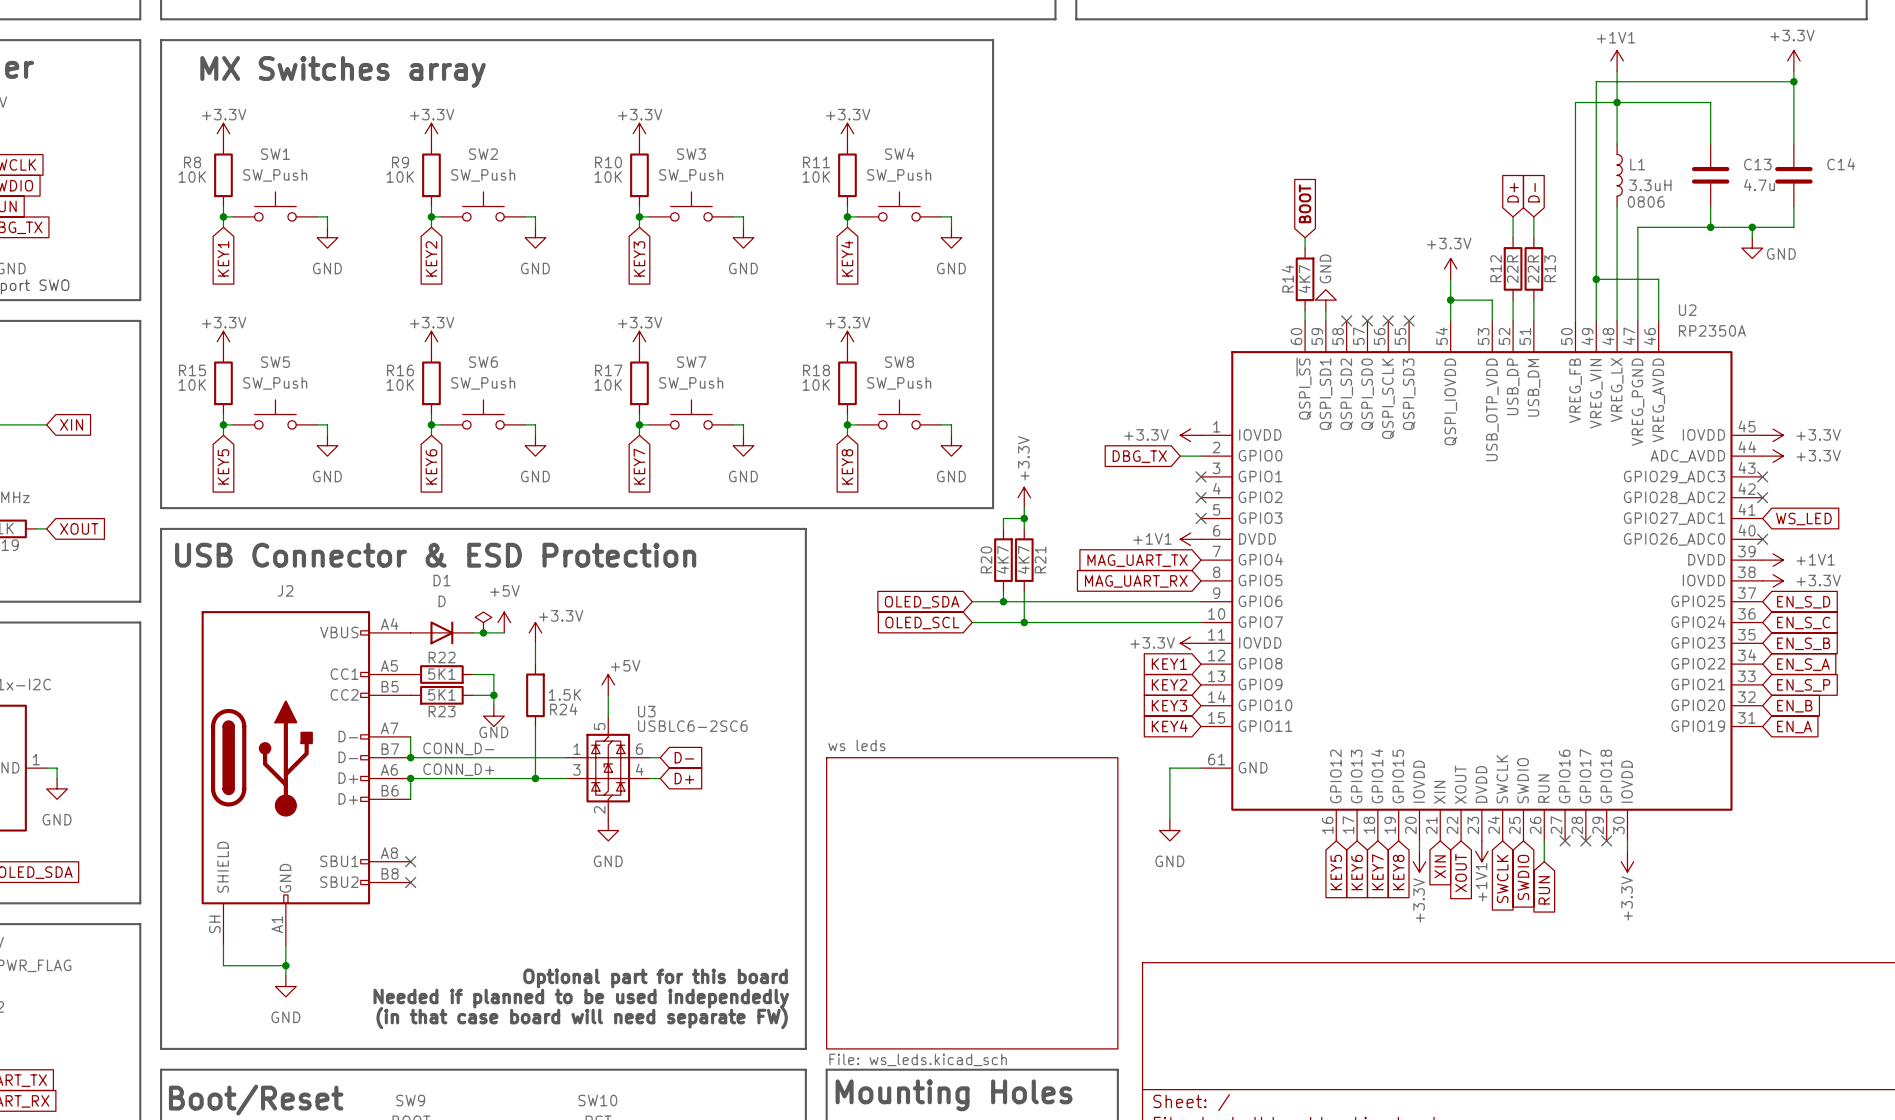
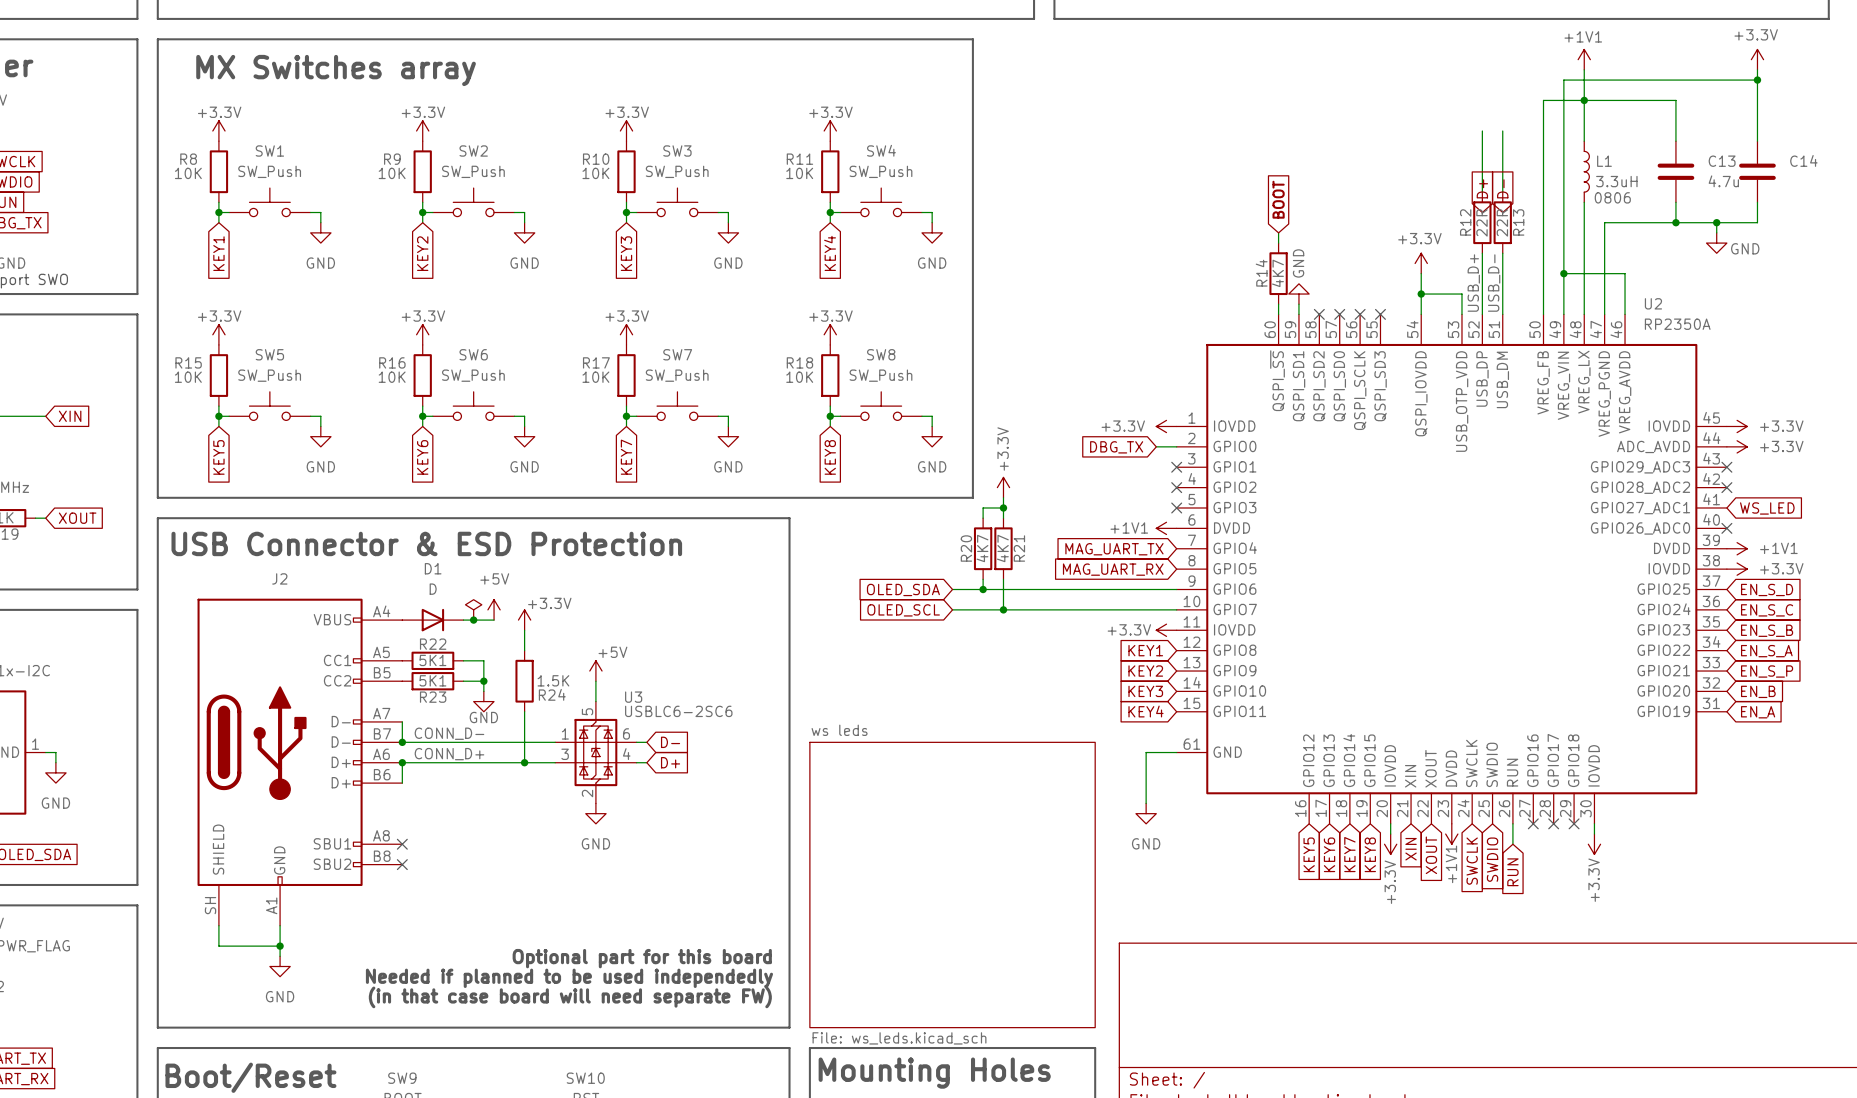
wire: none -> (1482, 131) (1482, 192)
wire: none -> (1502, 131) (1502, 192)
wire: (1513, 216) (1513, 237) -> none
wire: (1533, 216) (1533, 237) -> none
wire: none -> (1482, 253) (1482, 294)
wire: none -> (1502, 253) (1502, 294)
R12 position: (1513, 268) -> (1482, 222)
R13 position: (1533, 268) -> (1502, 222)
label: none -> USB_D+ (1473, 283)
label: none -> USB_D- (1494, 283)

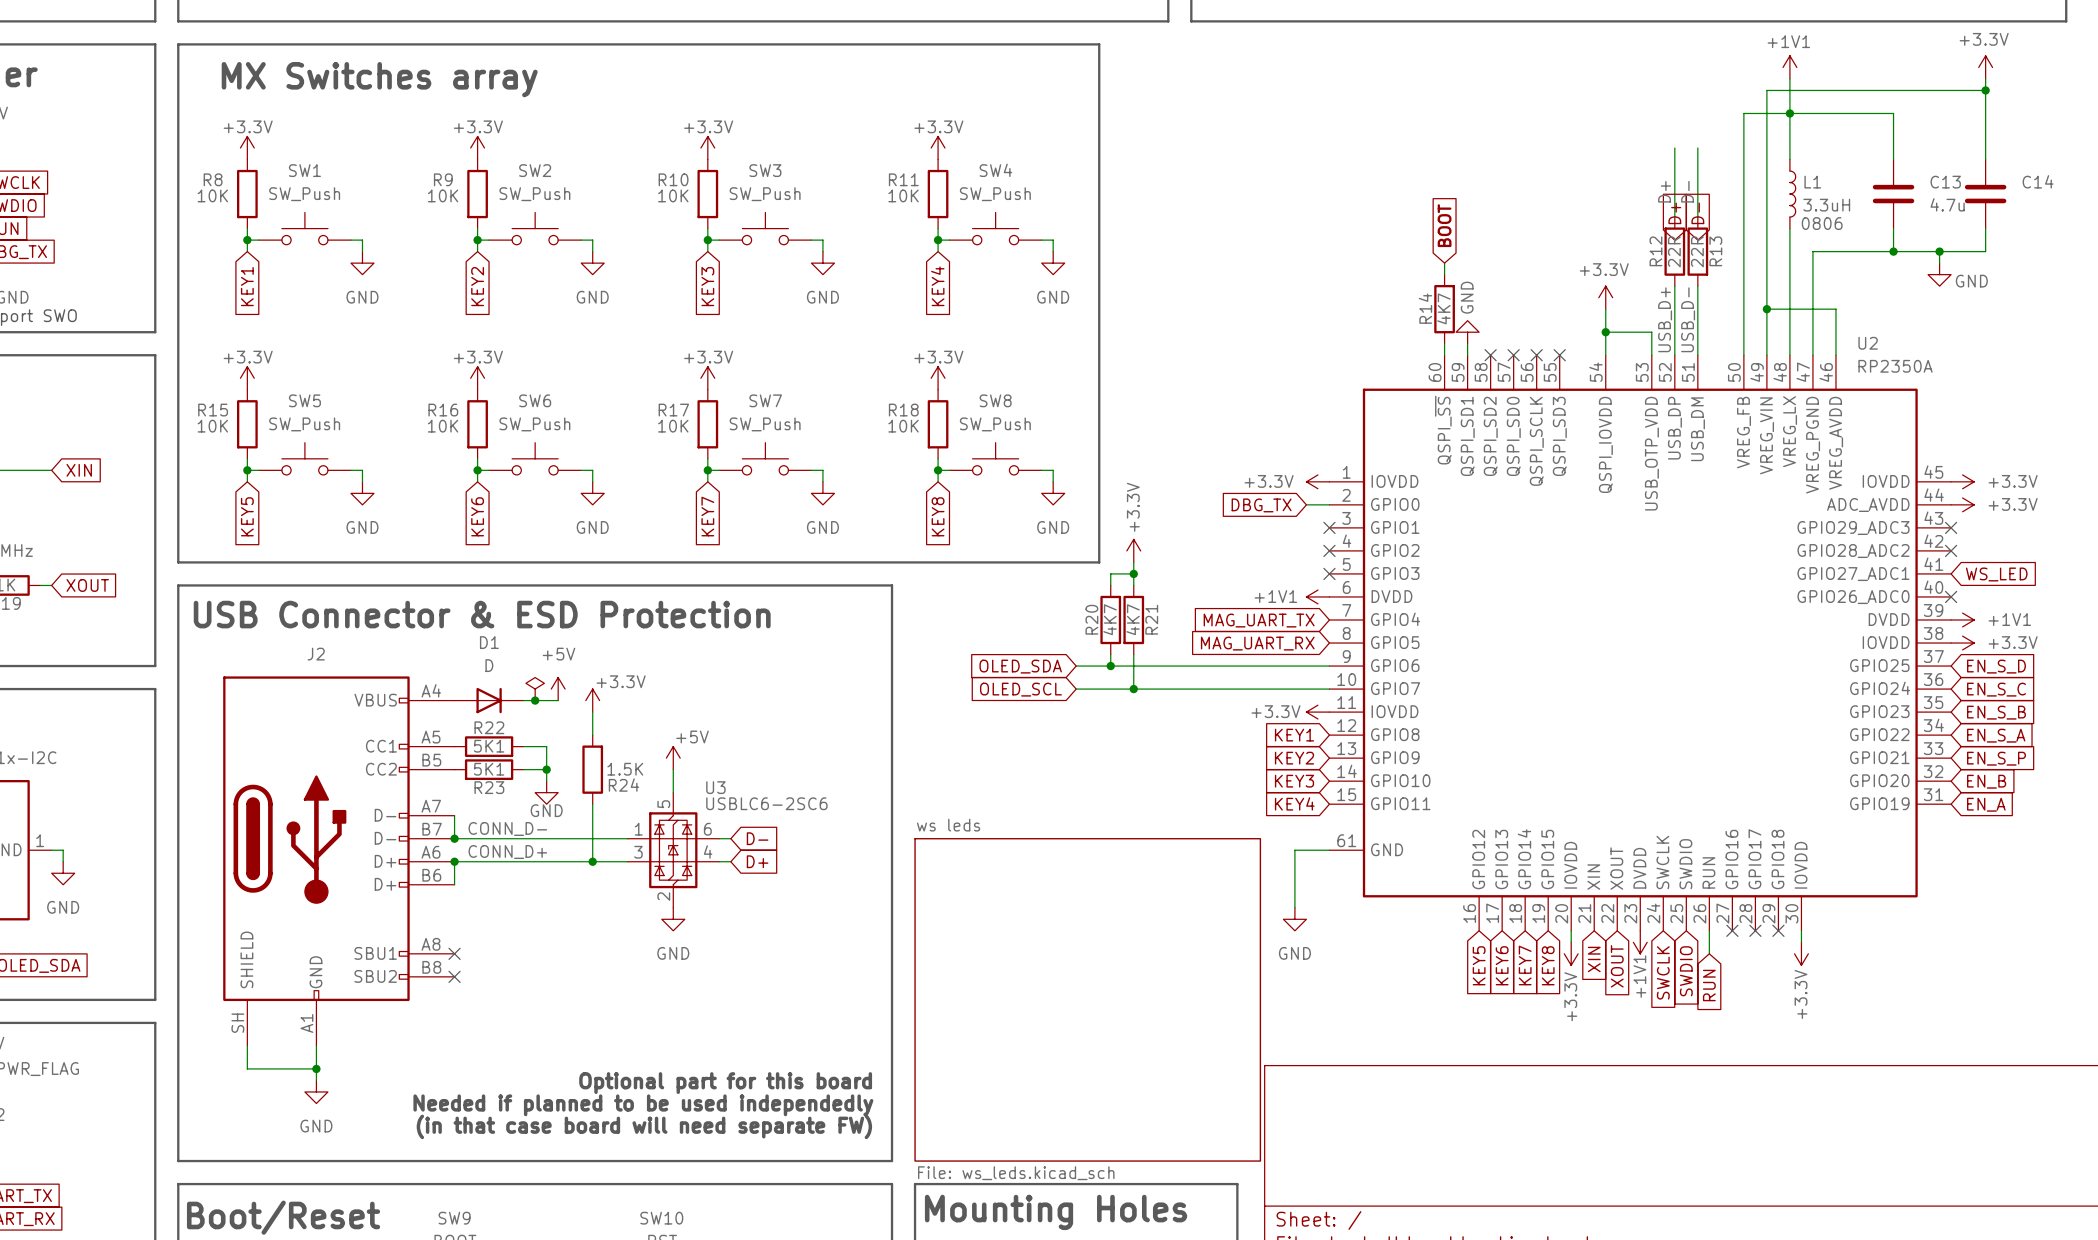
label: none -> D+ (1664, 191)
label: none -> D- (1687, 191)
sheet ws leds: File: ws_leds.kicad_sch (952, 884) -> none
sheet ws leds: none -> File: ws_leds.kicad_sch (1087, 999)

